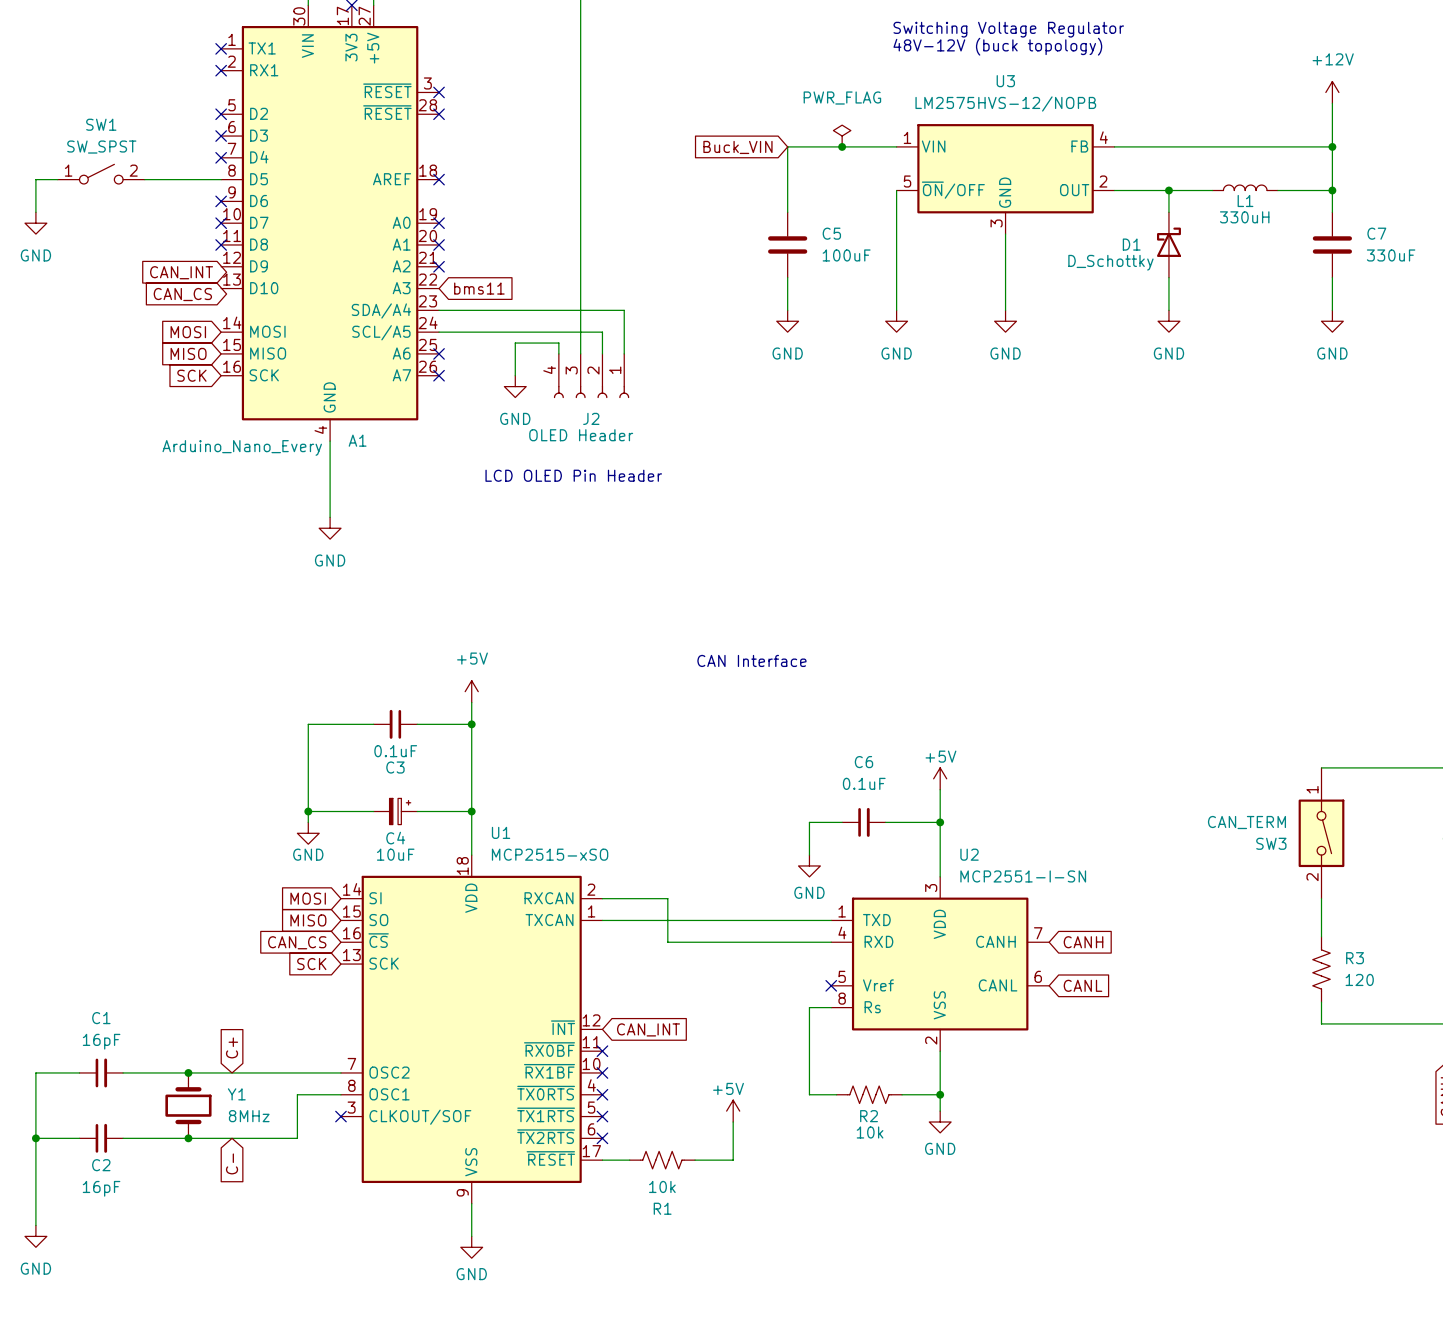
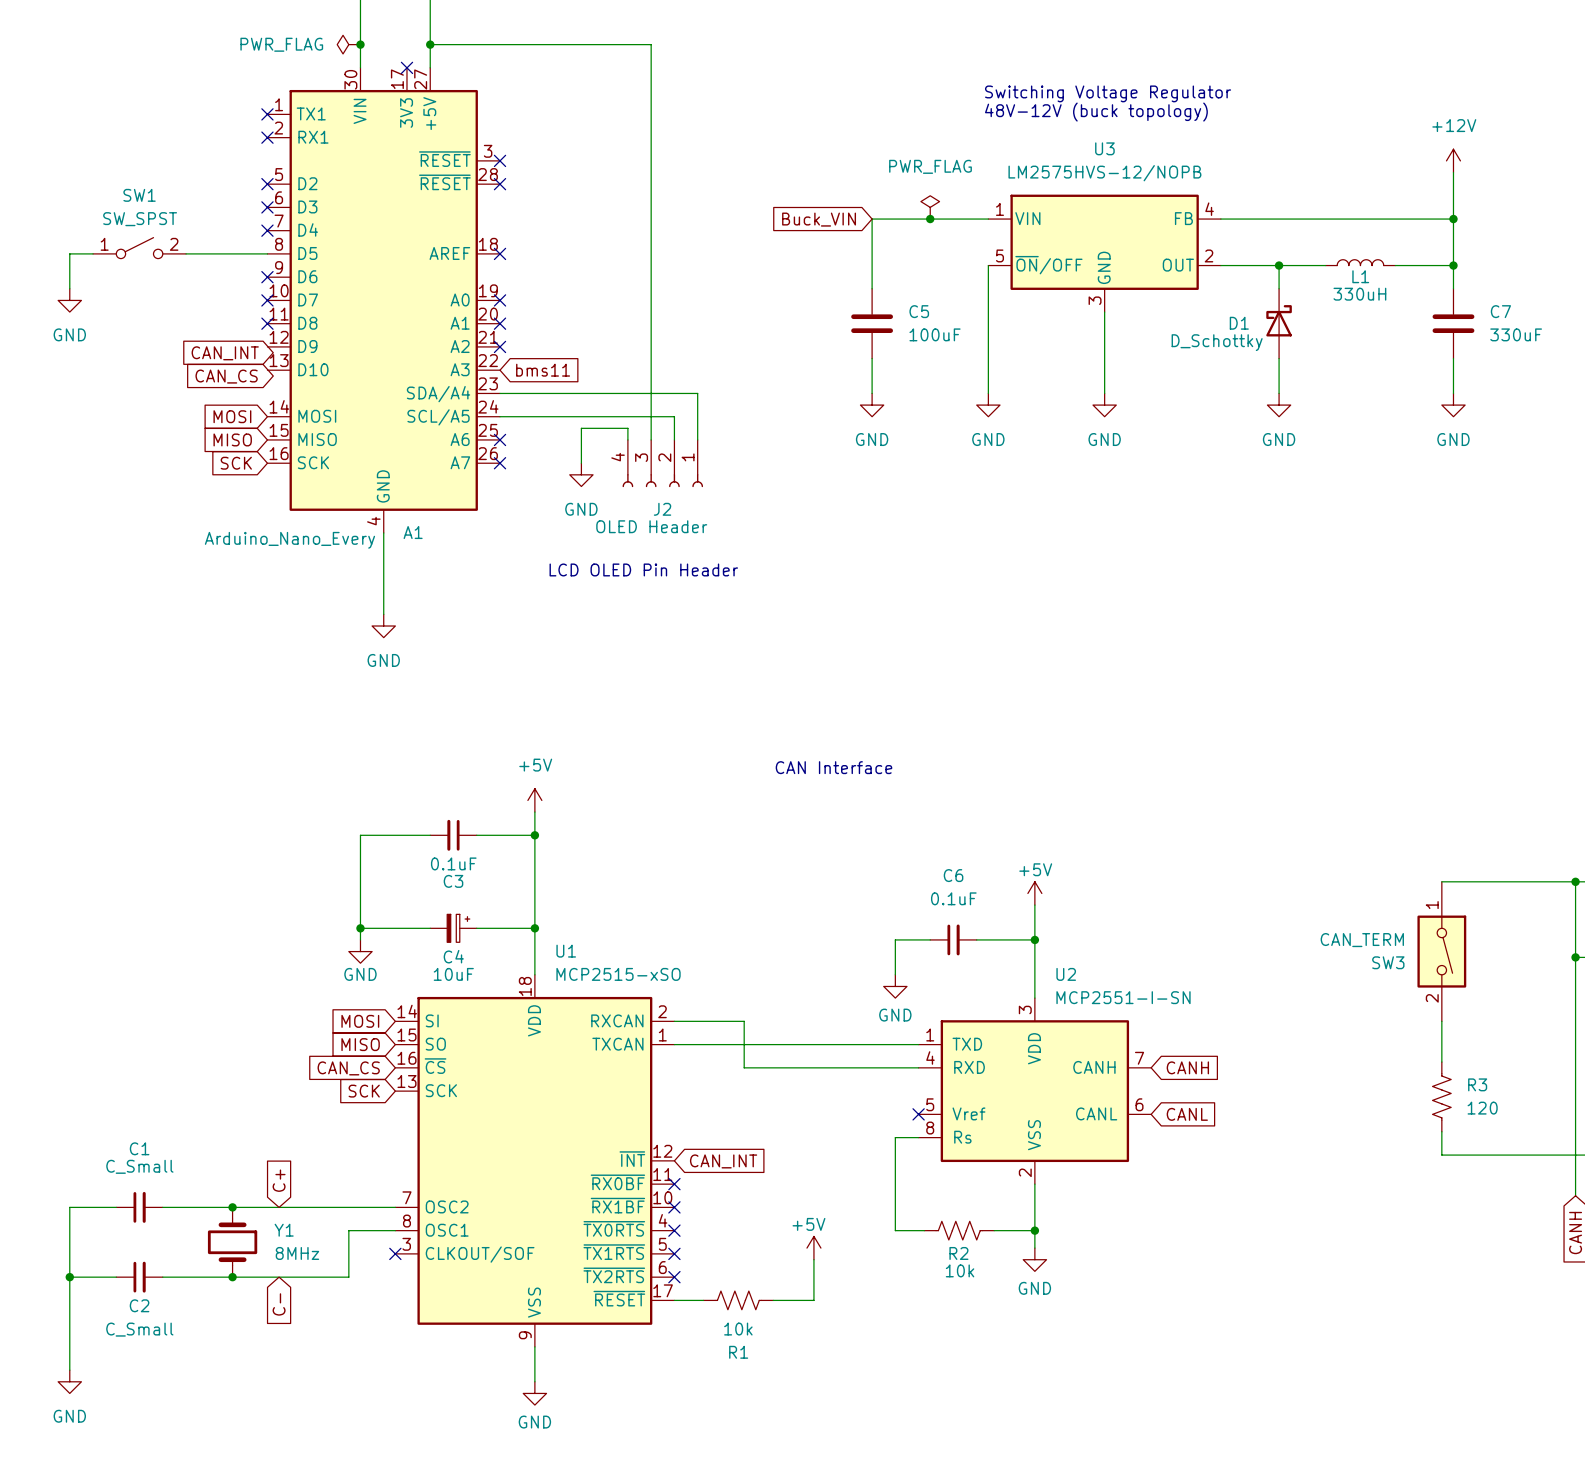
C1 value: 16pF (101, 1041) -> C_Small (139, 1166)
C2 value: 16pF (101, 1188) -> C_Small (139, 1329)

